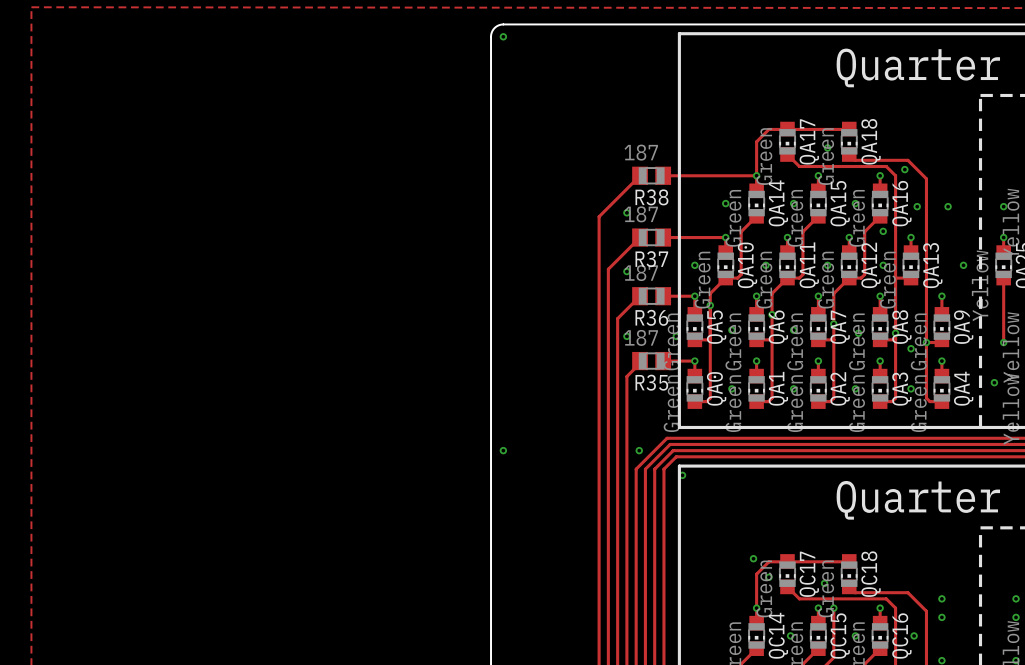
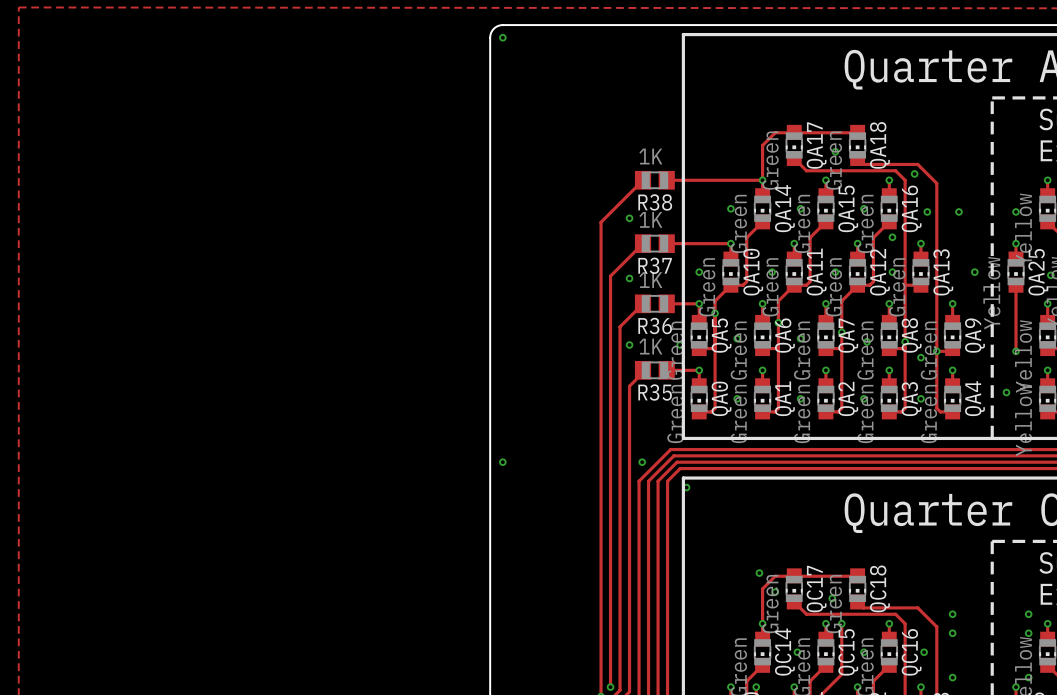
R38 value: 187 (641, 152) -> 1K (650, 156)
R37 value: 187 (641, 214) -> 1K (650, 219)
R36 value: 187 (641, 273) -> 1K (650, 280)
R35 value: 187 (641, 337) -> 1K (650, 346)

